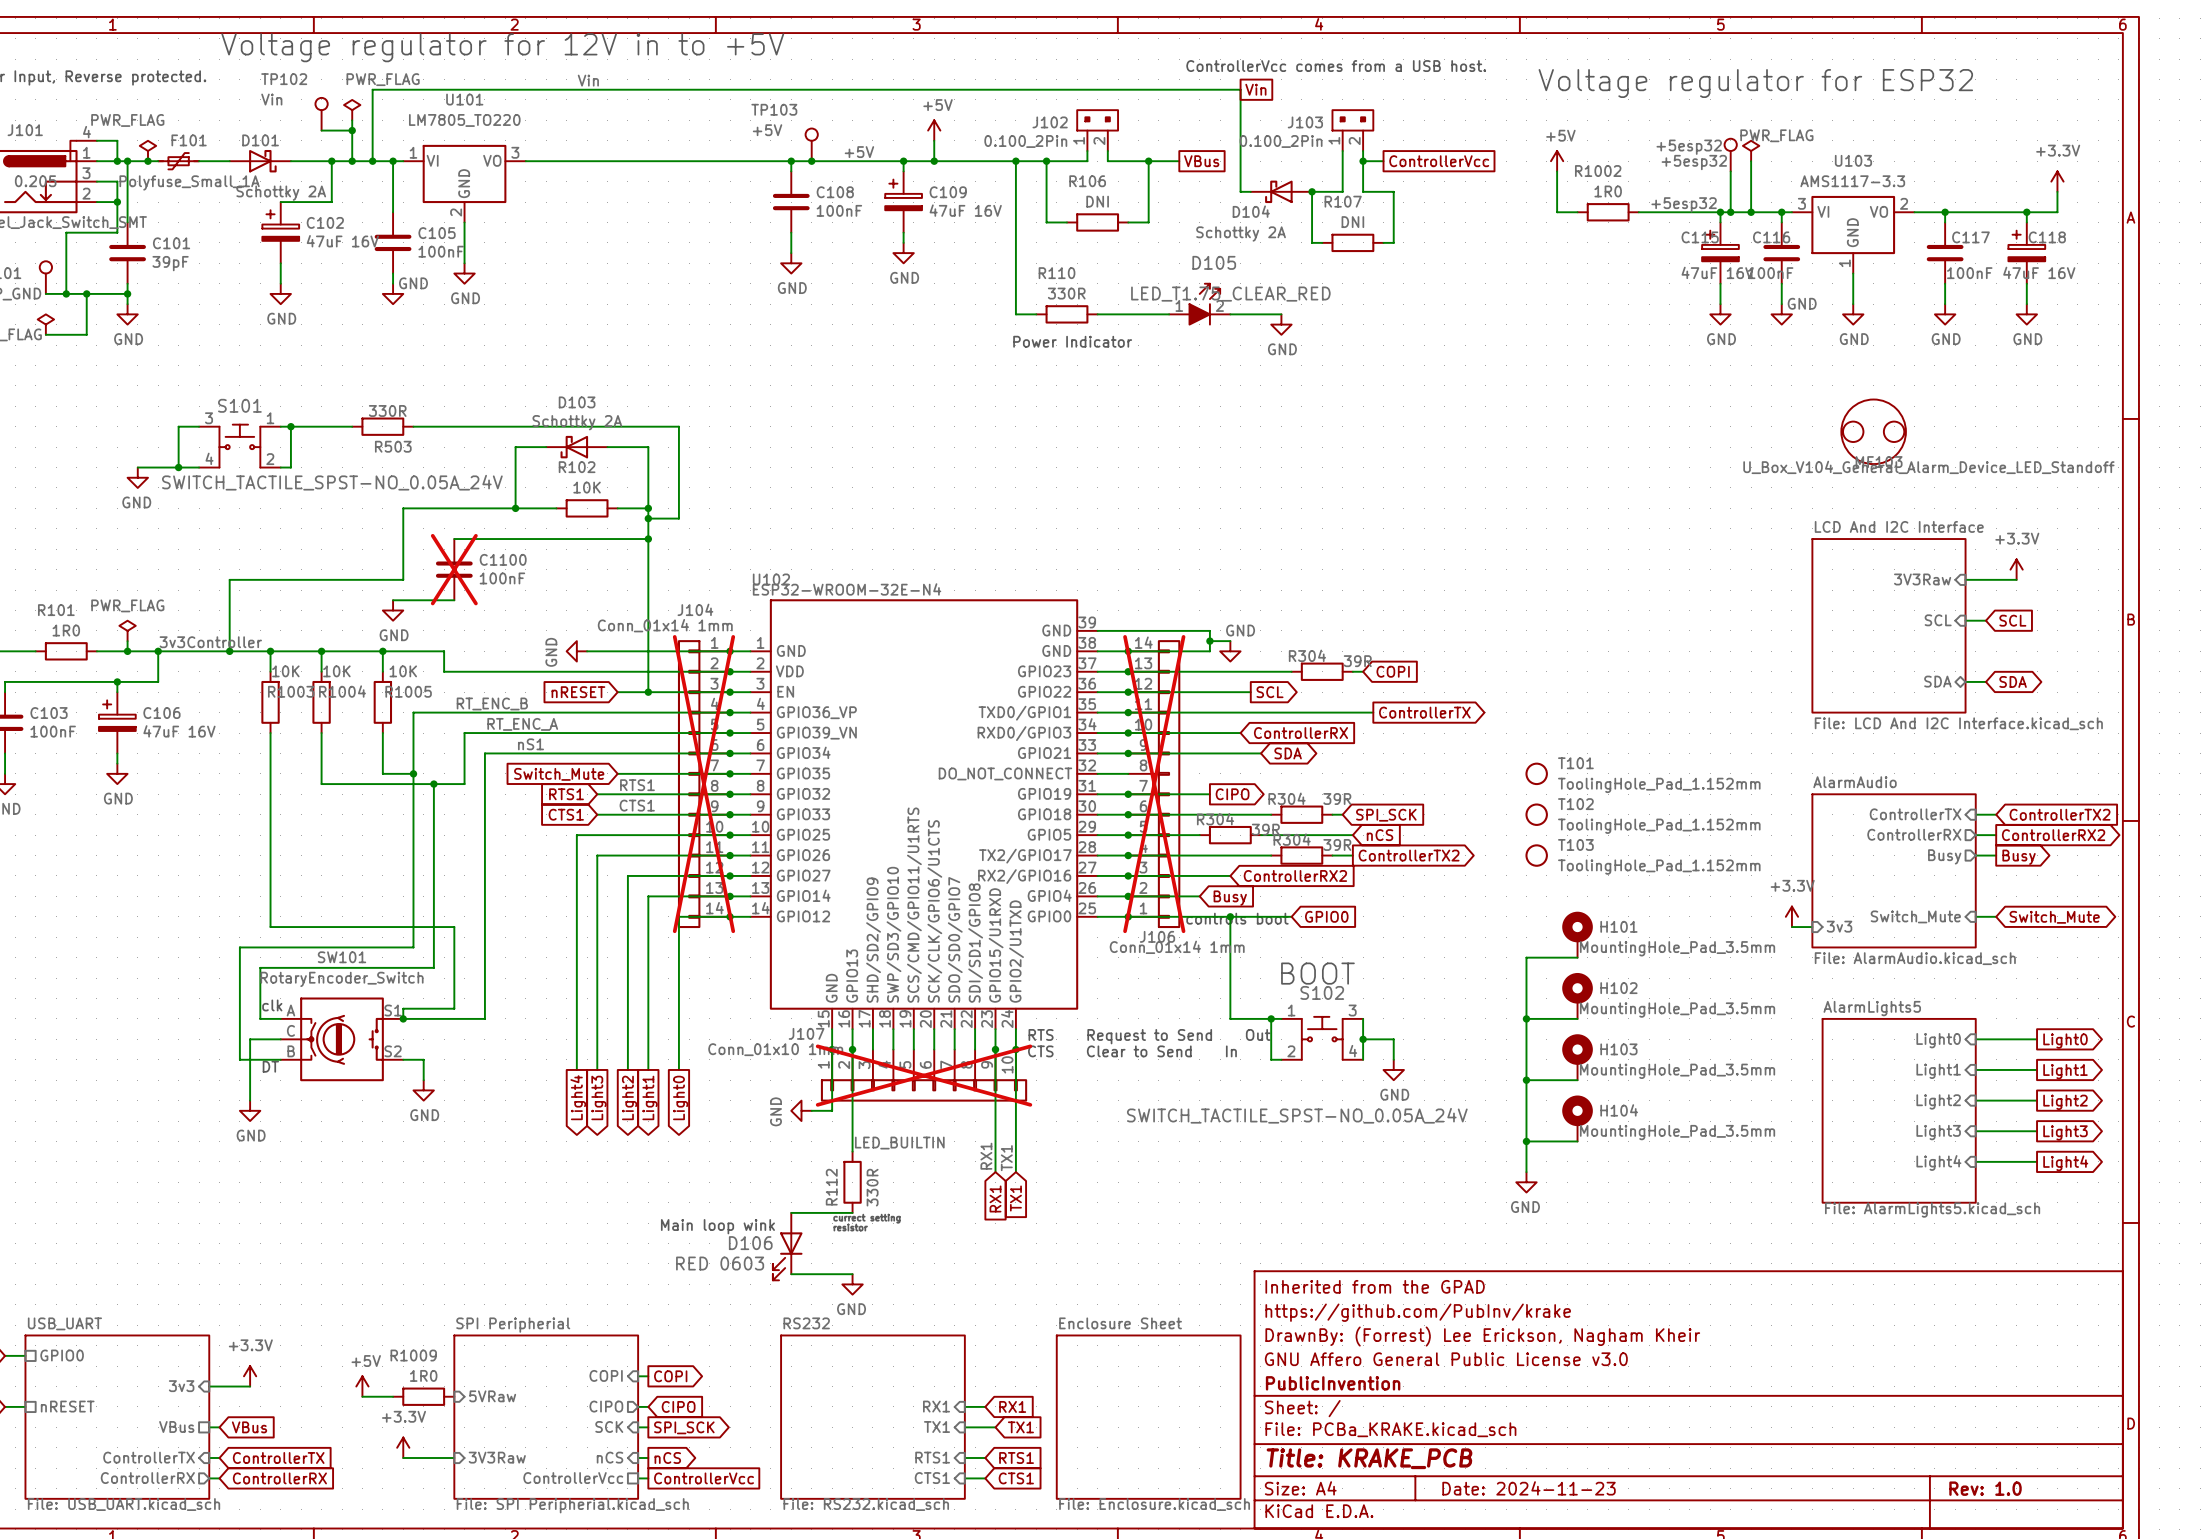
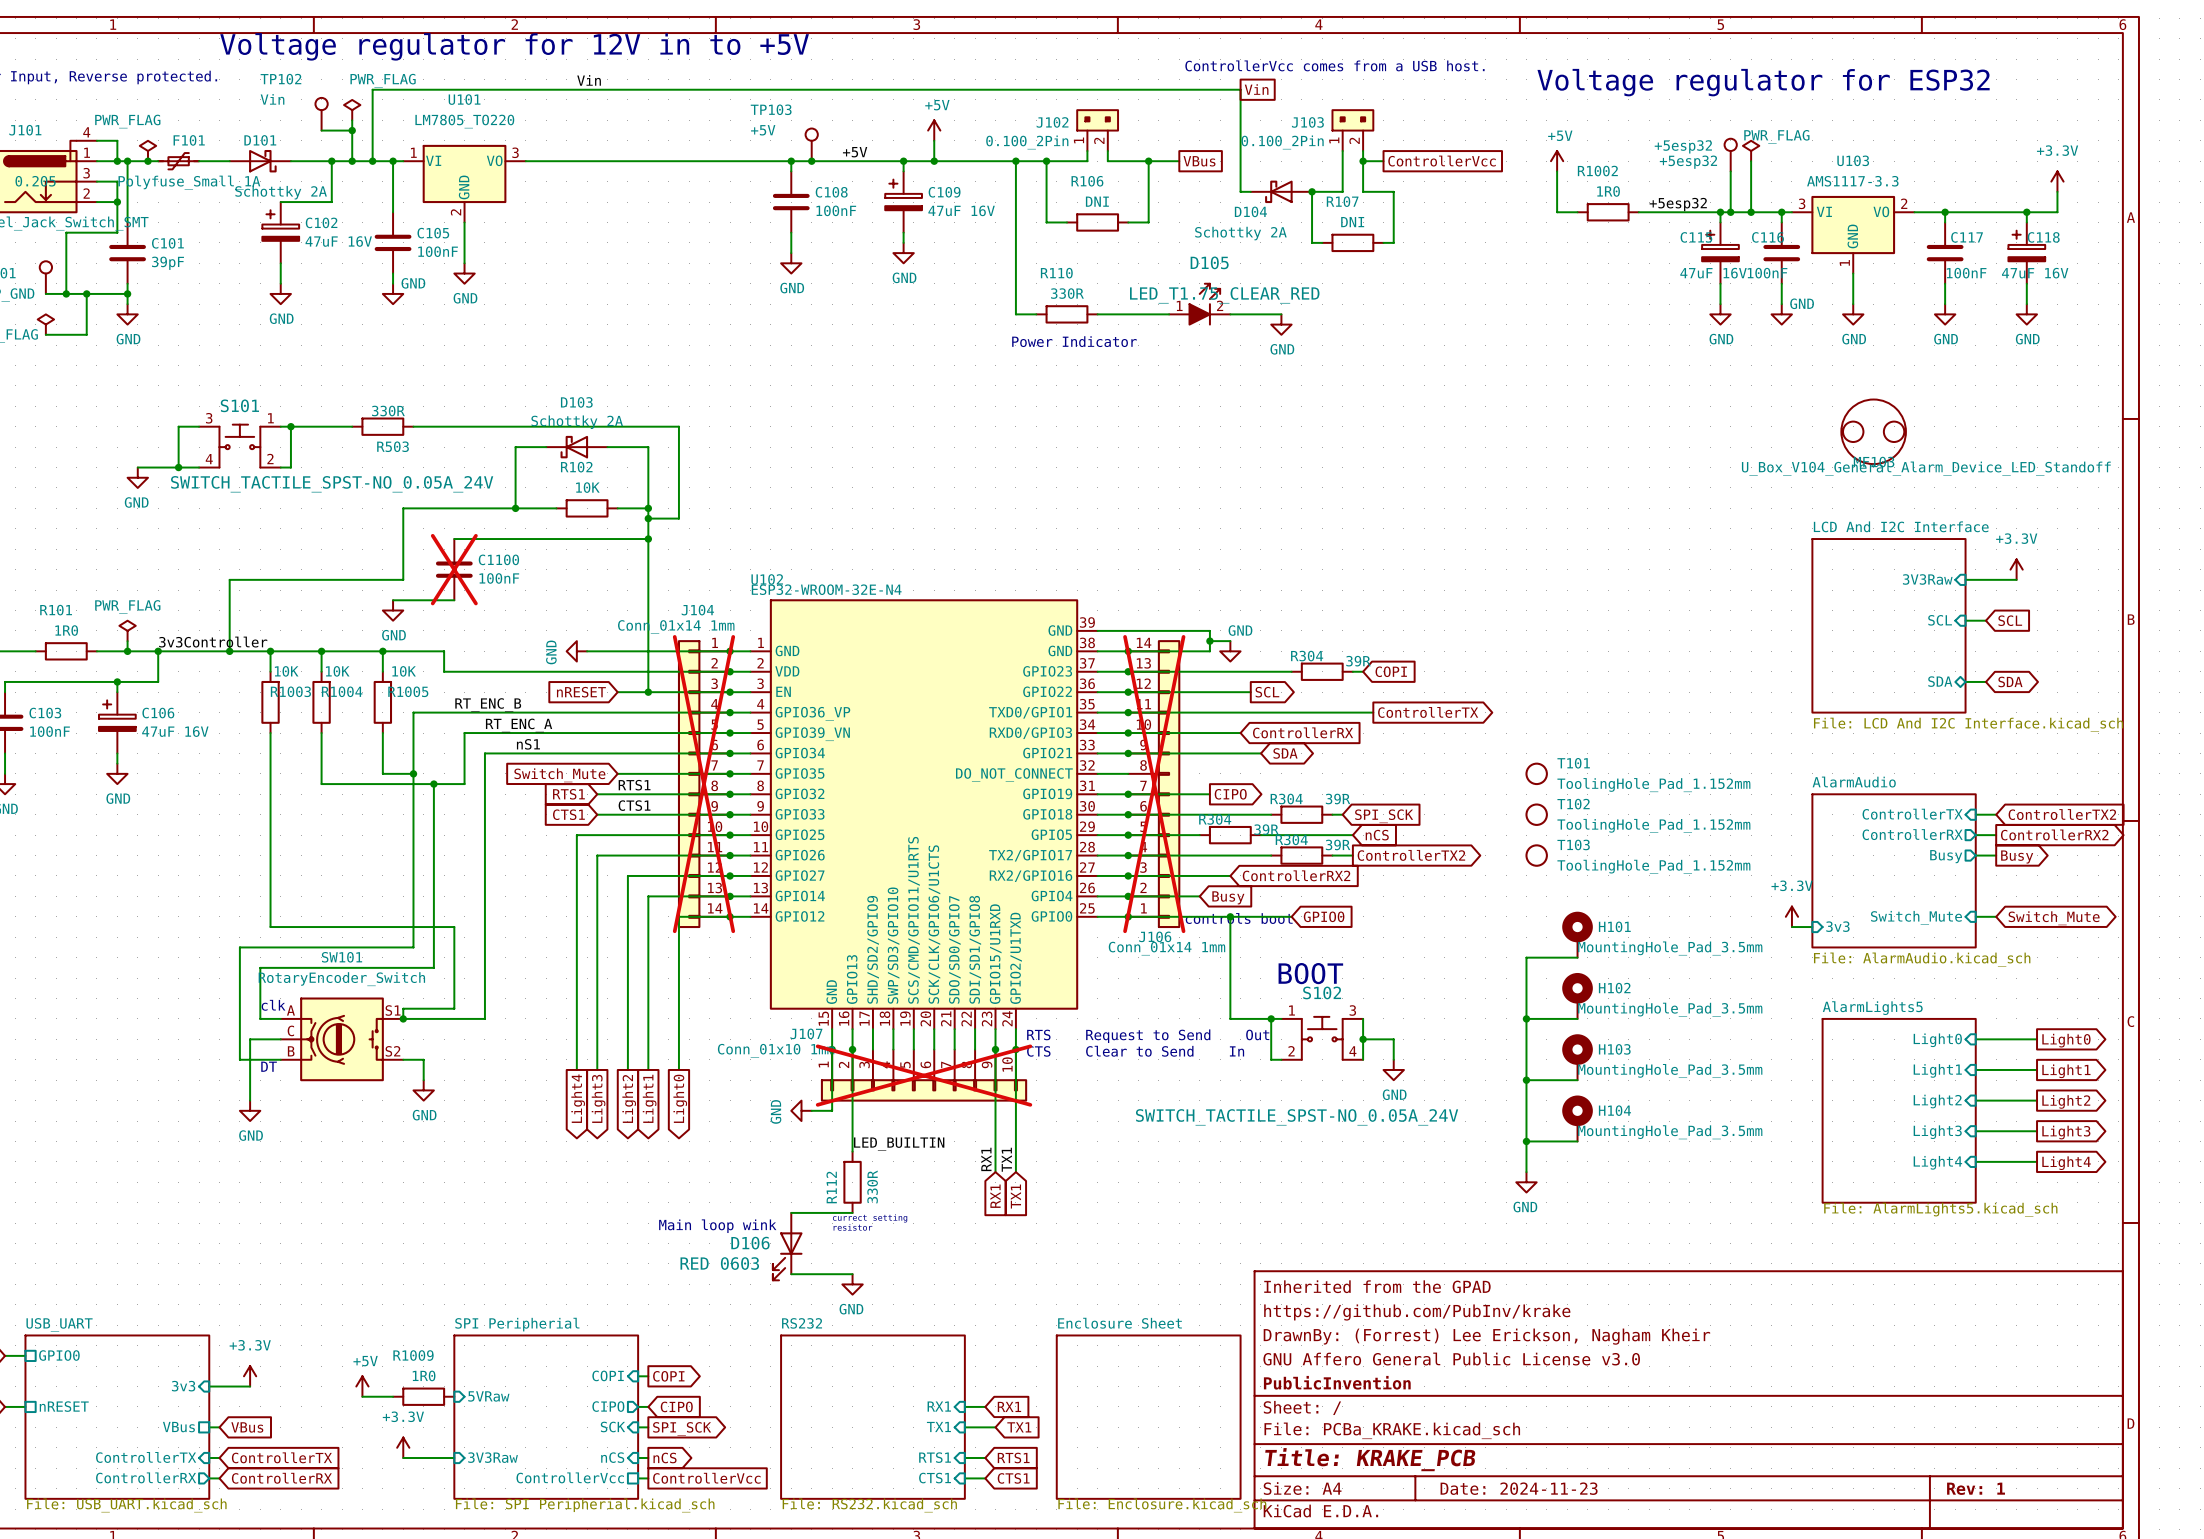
title block: Rev: 1.0 (1985, 1488) -> Rev: 1 (1976, 1488)

